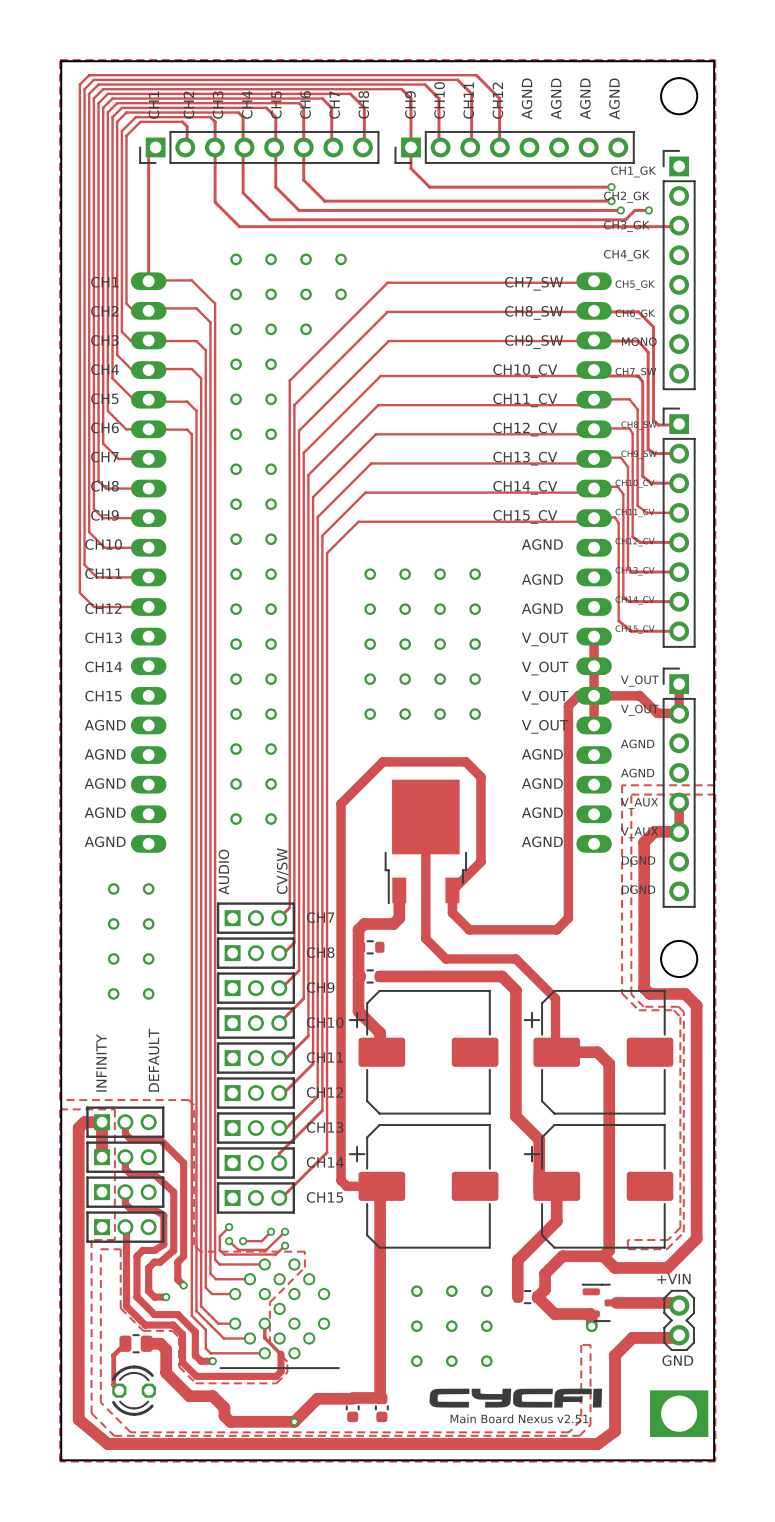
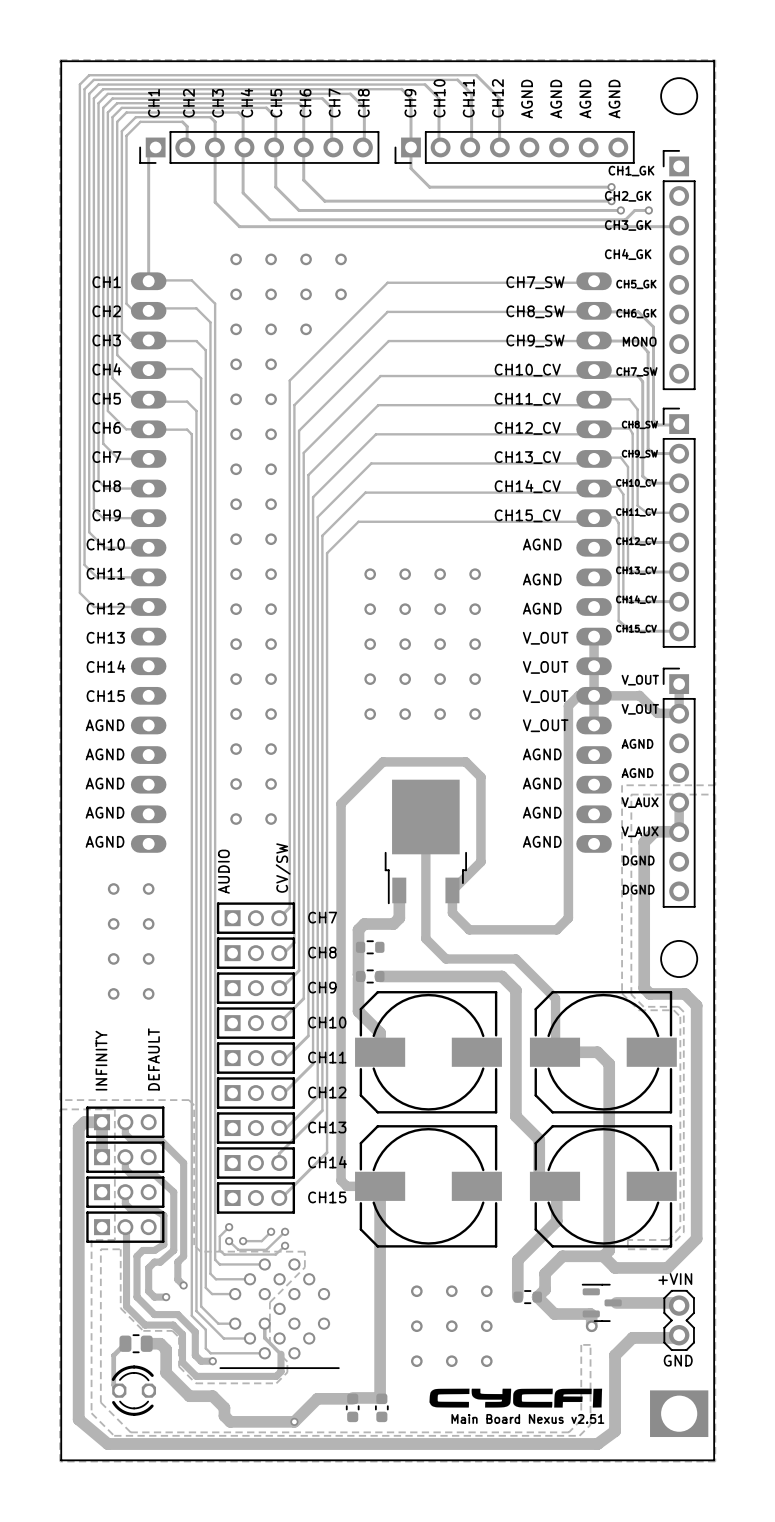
part footprint: [349, 990, 499, 1115] -> [355, 991, 502, 1114]
part footprint: [523, 990, 674, 1115] -> [529, 991, 677, 1114]
part footprint: [349, 1124, 499, 1249] -> [355, 1125, 502, 1248]
part footprint: [523, 1124, 674, 1249] -> [529, 1125, 677, 1248]

